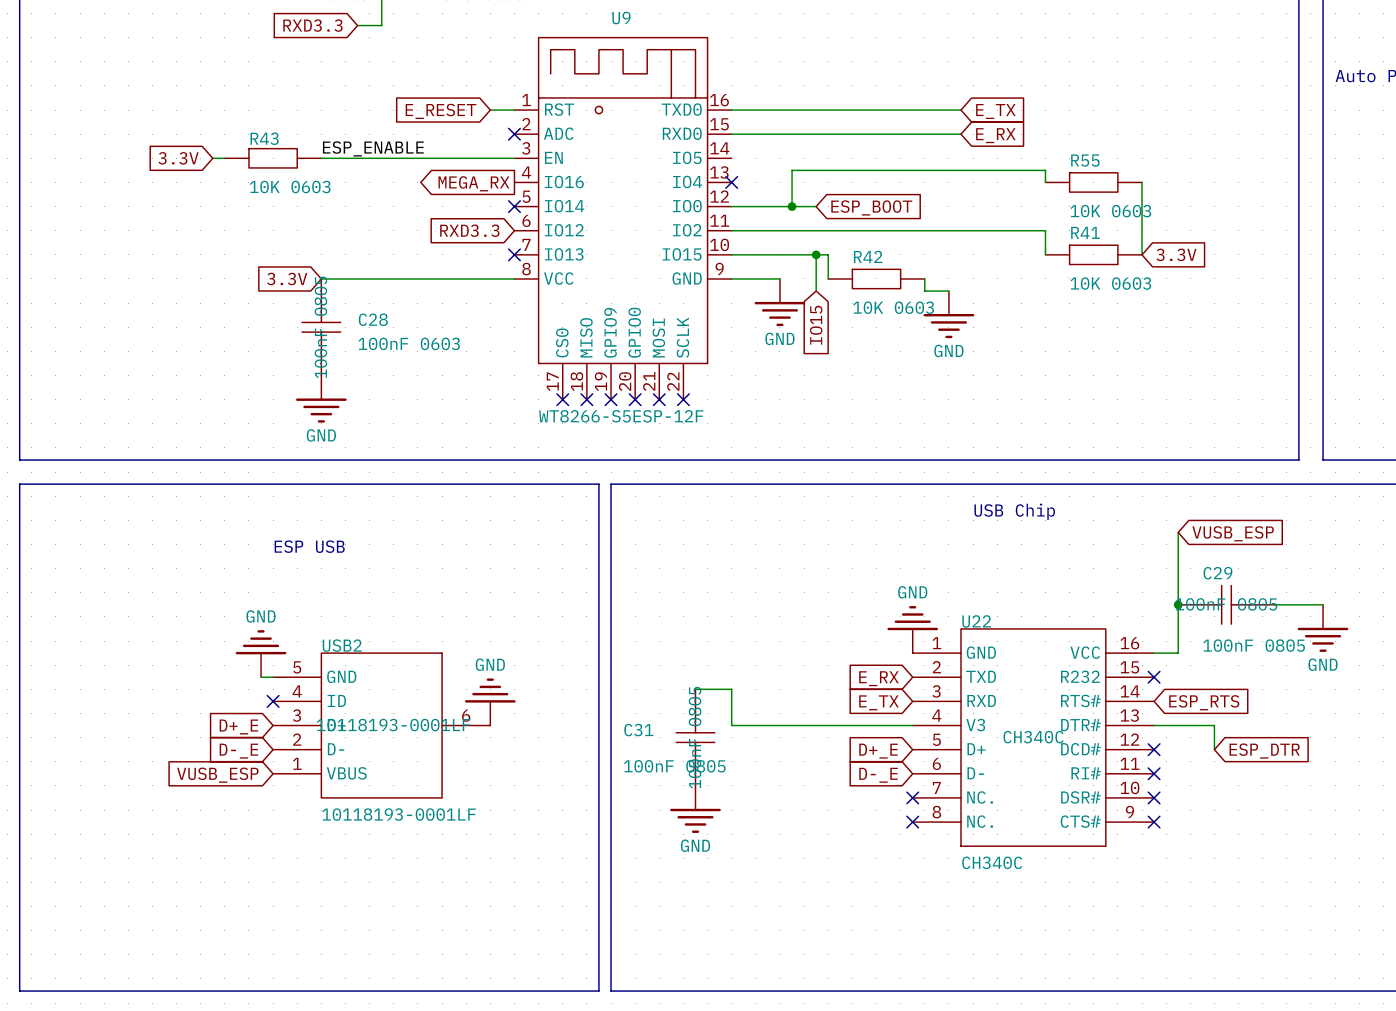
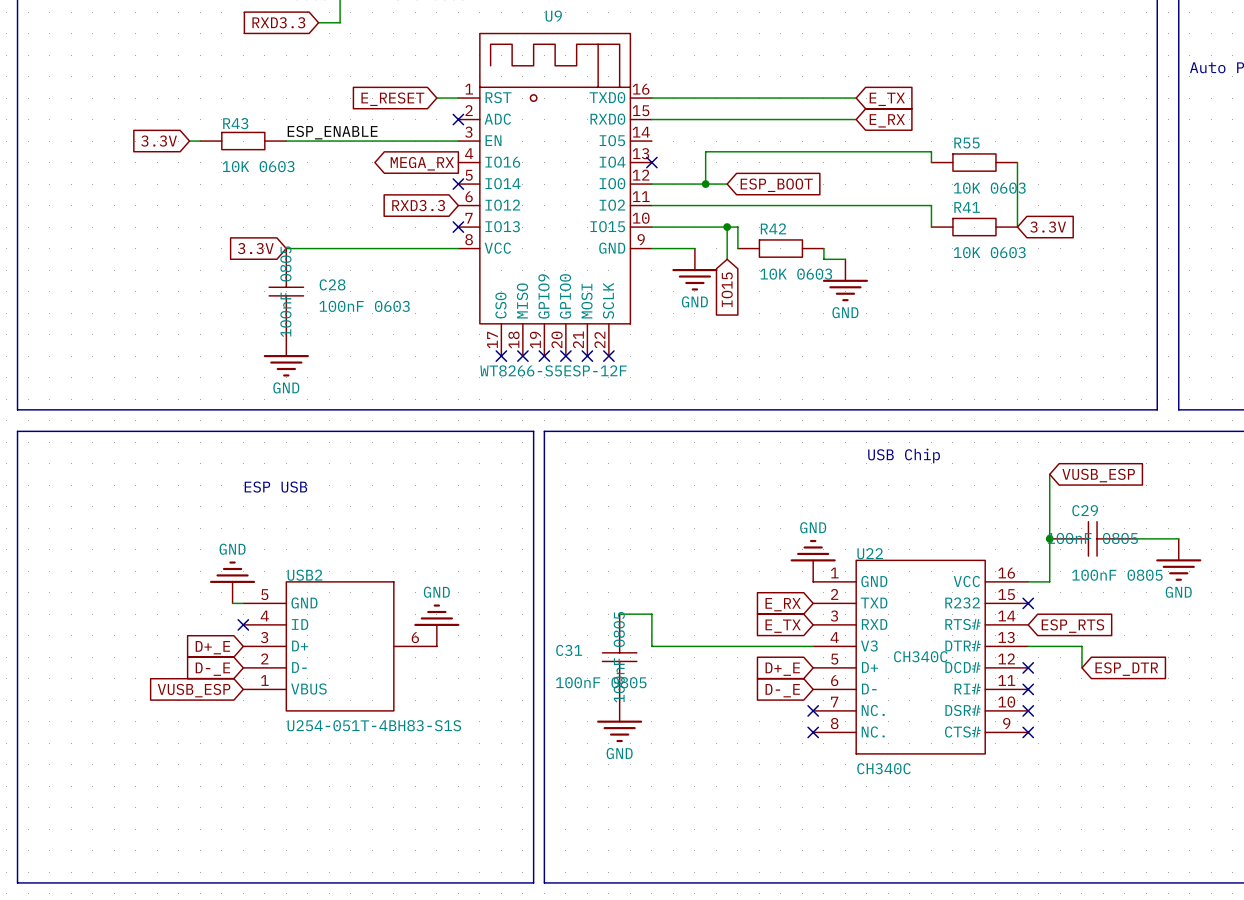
USB2 text: 10118193-0001LF (393, 725) -> none
USB2 value: 10118193-0001LF (399, 814) -> U254-051T-4BH83-S1S (374, 725)

